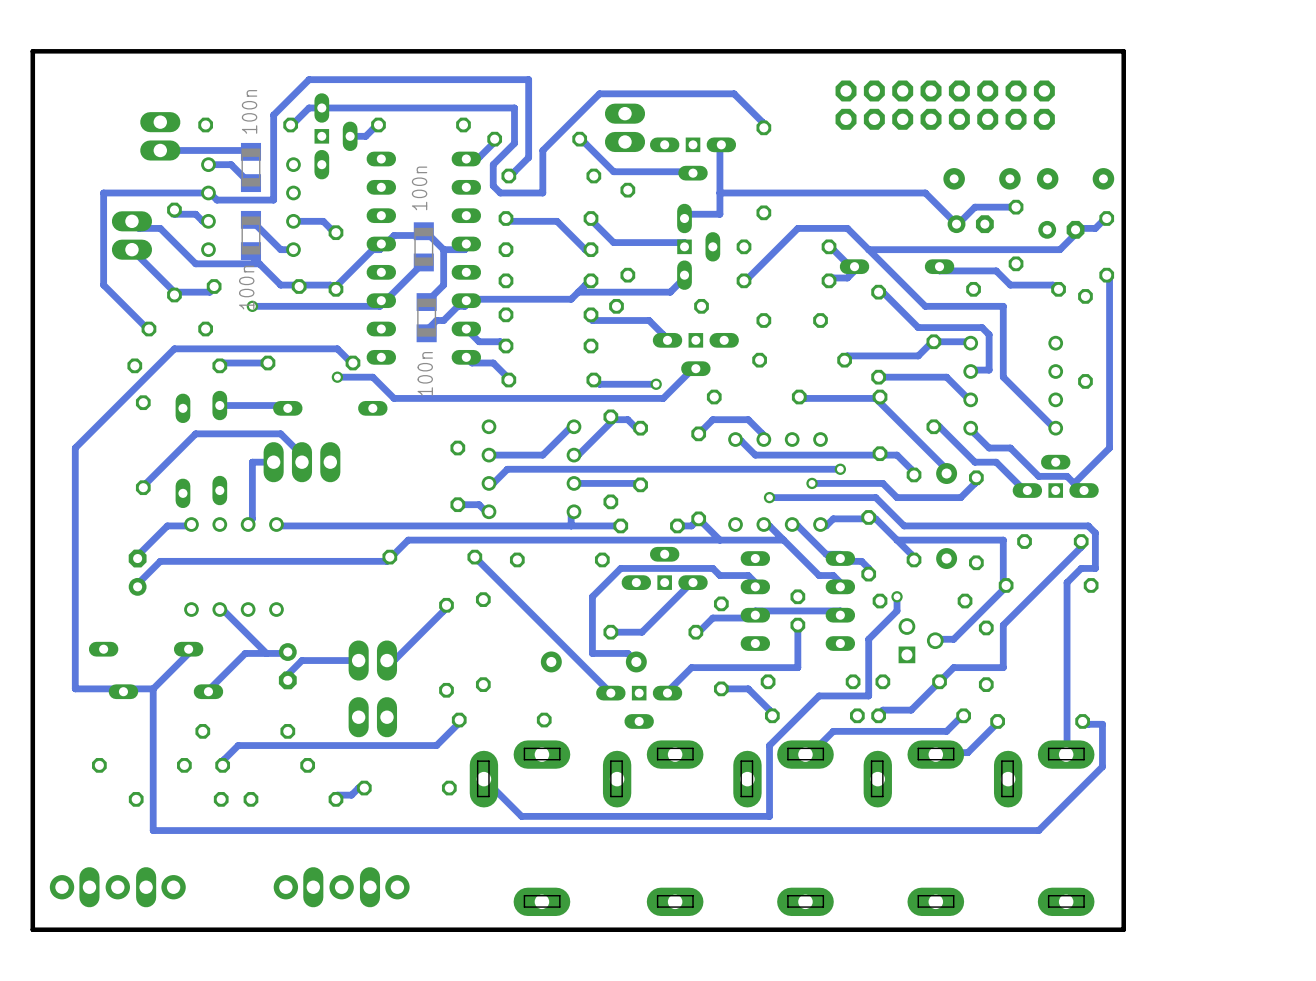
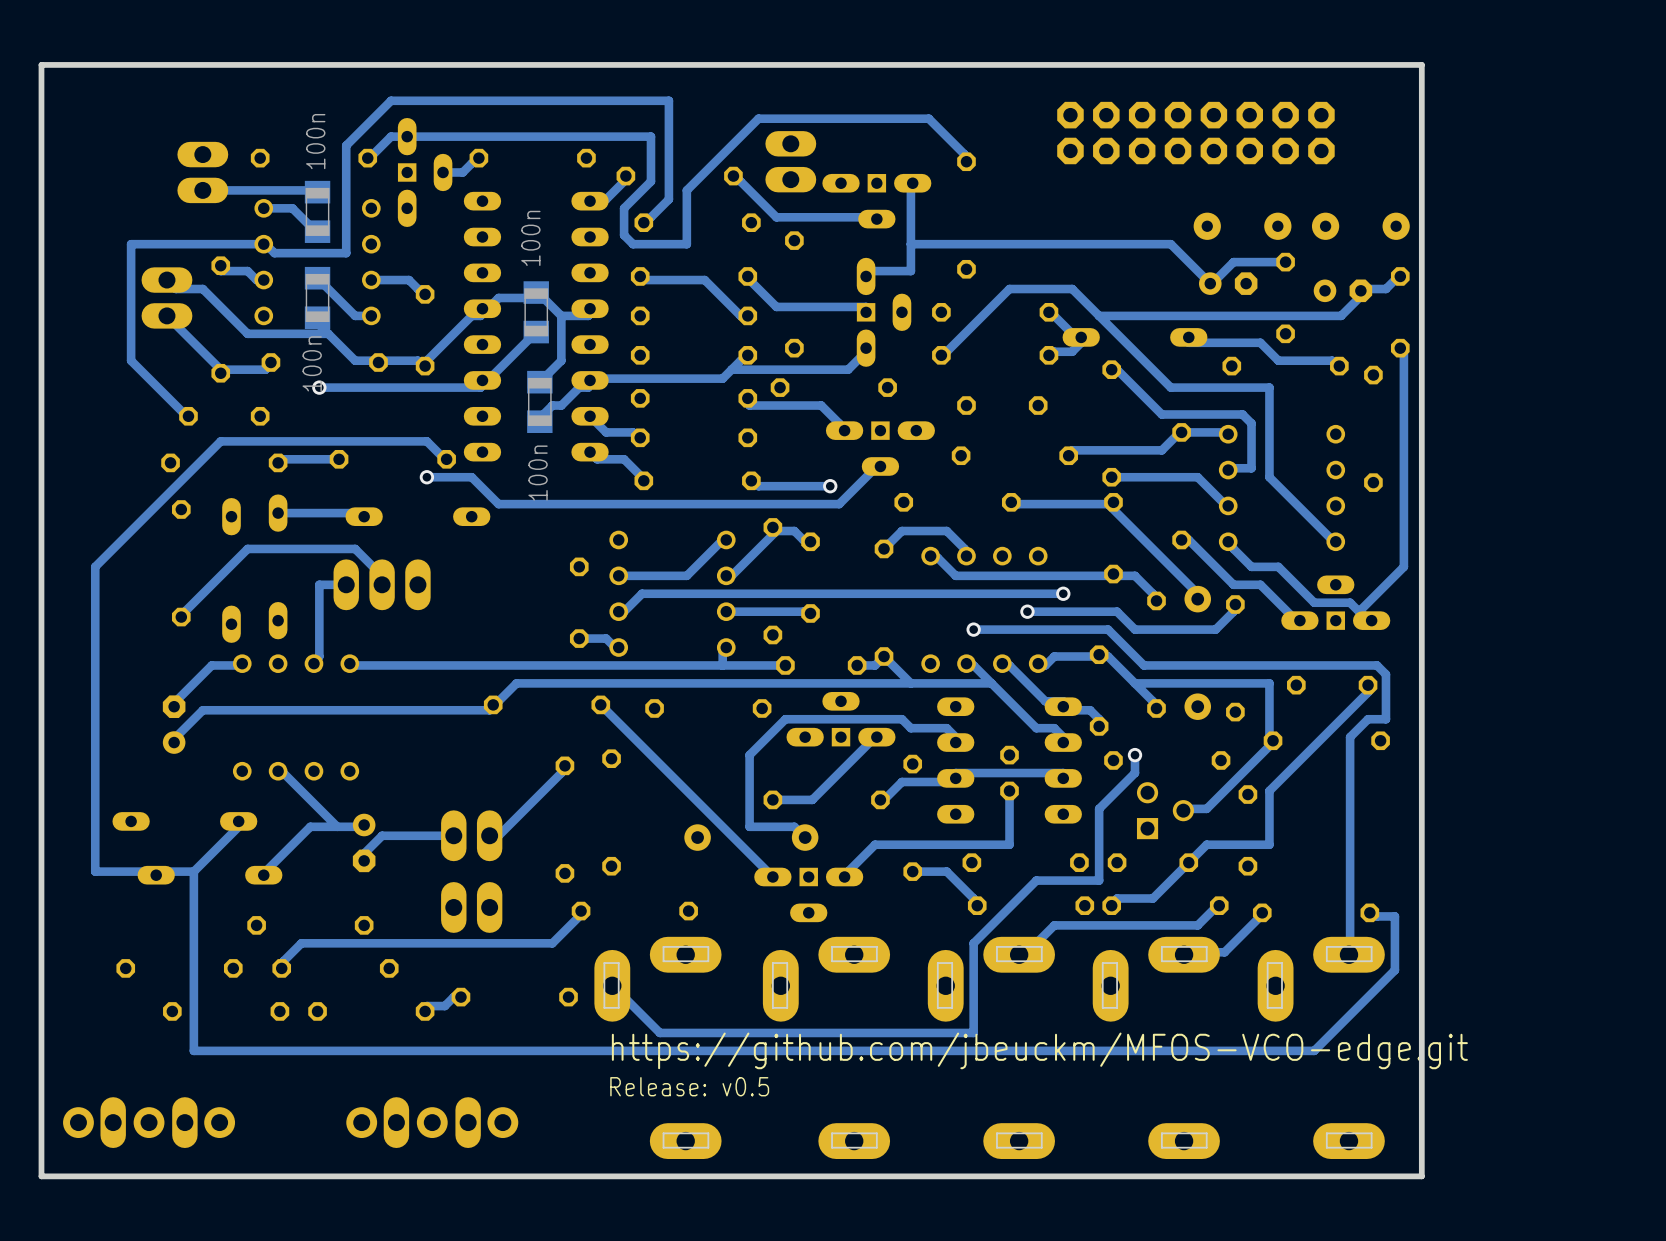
text: none -> https://github.com/jbeuckm/MFOS-VCO-edge.git (1039, 1050)
text: none -> Release: v0.5 (689, 1086)

